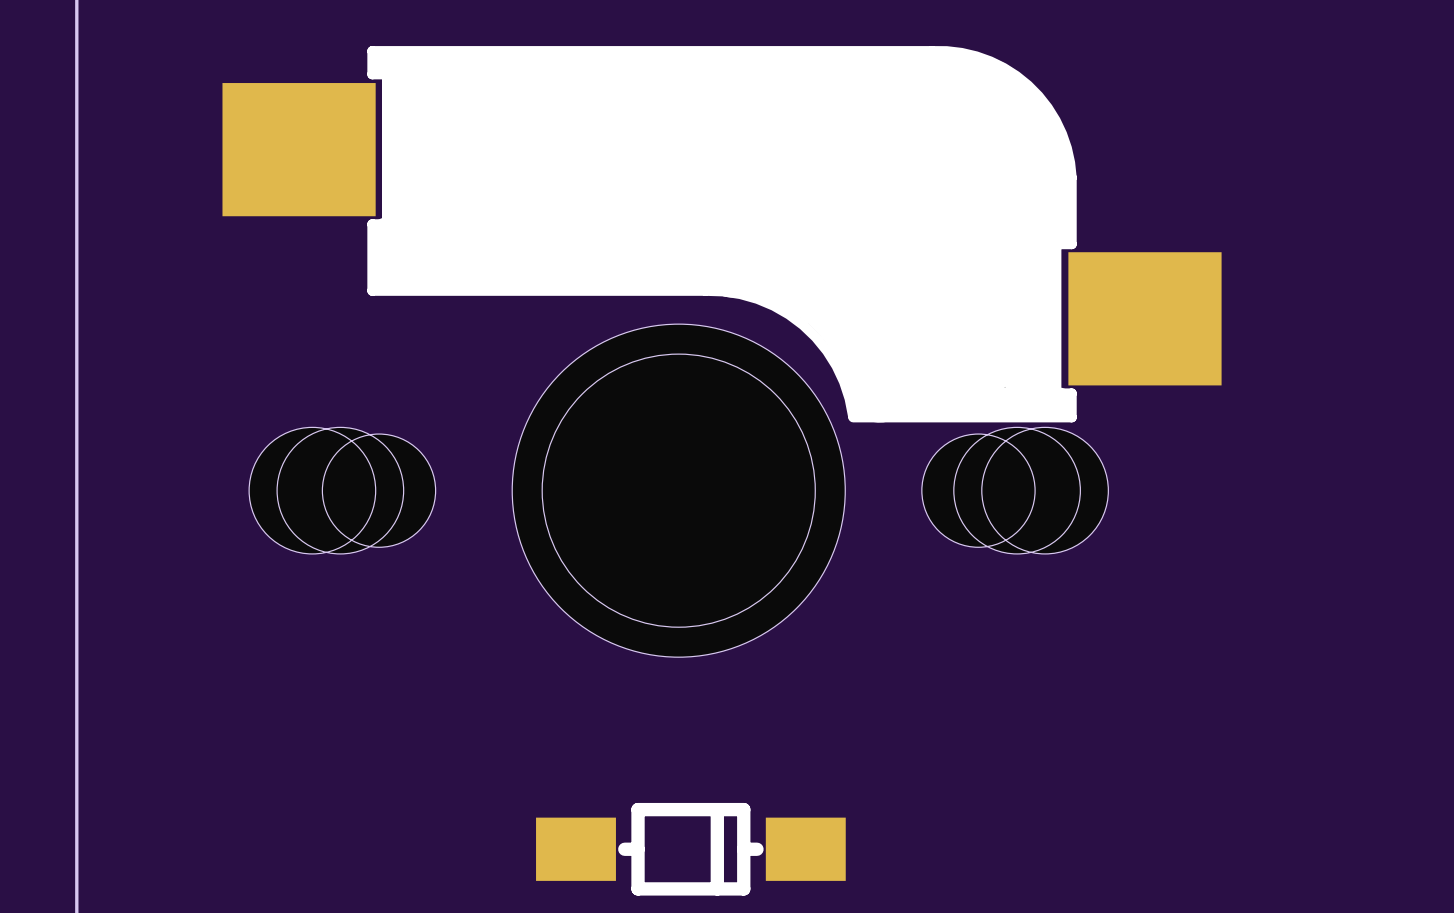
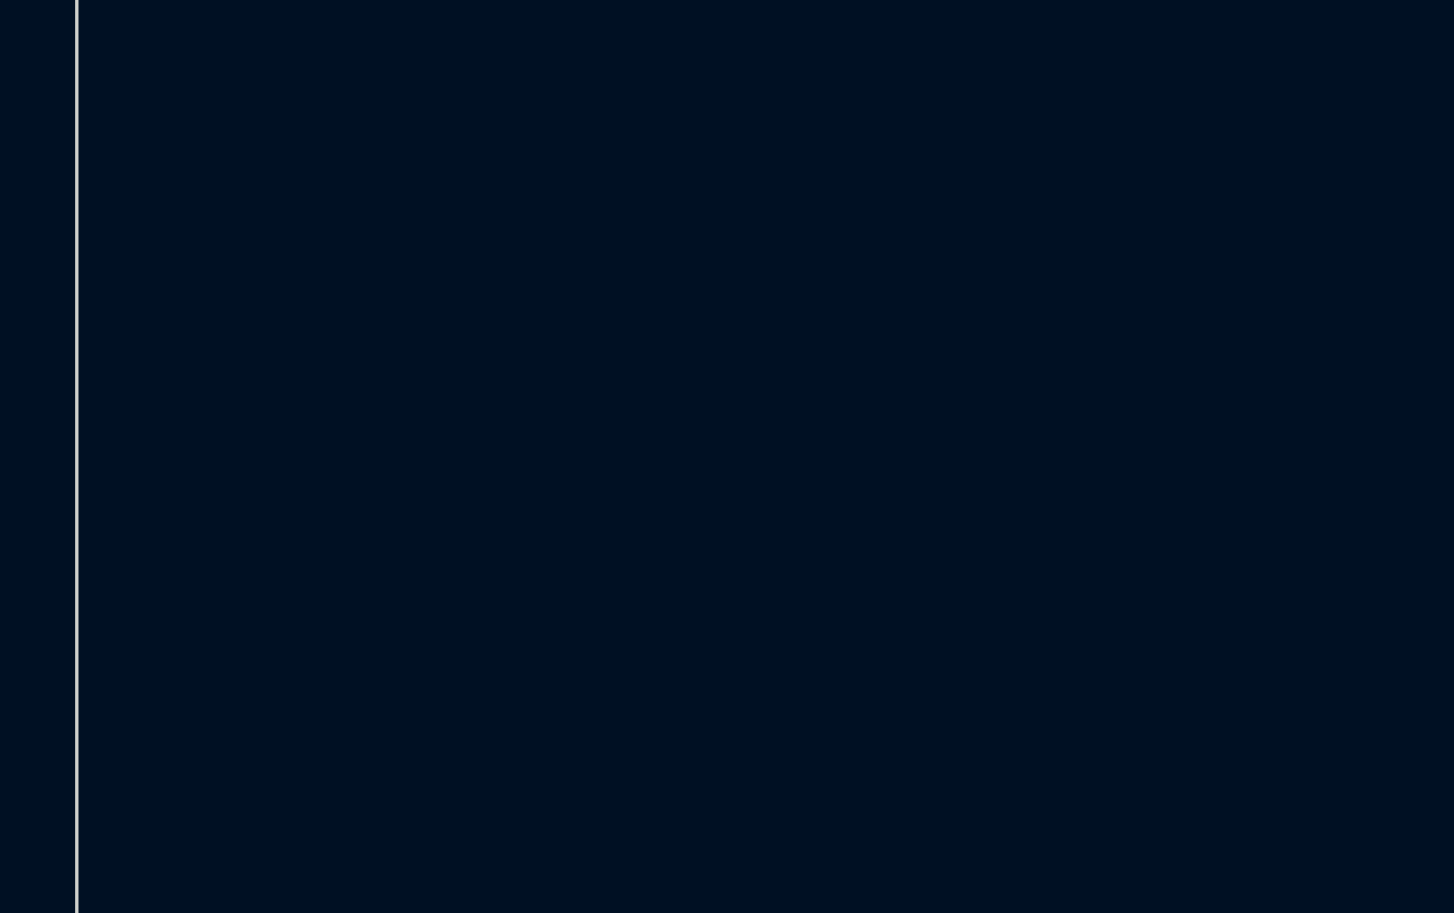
part: (722, 351) -> none
part: (690, 849) -> none

